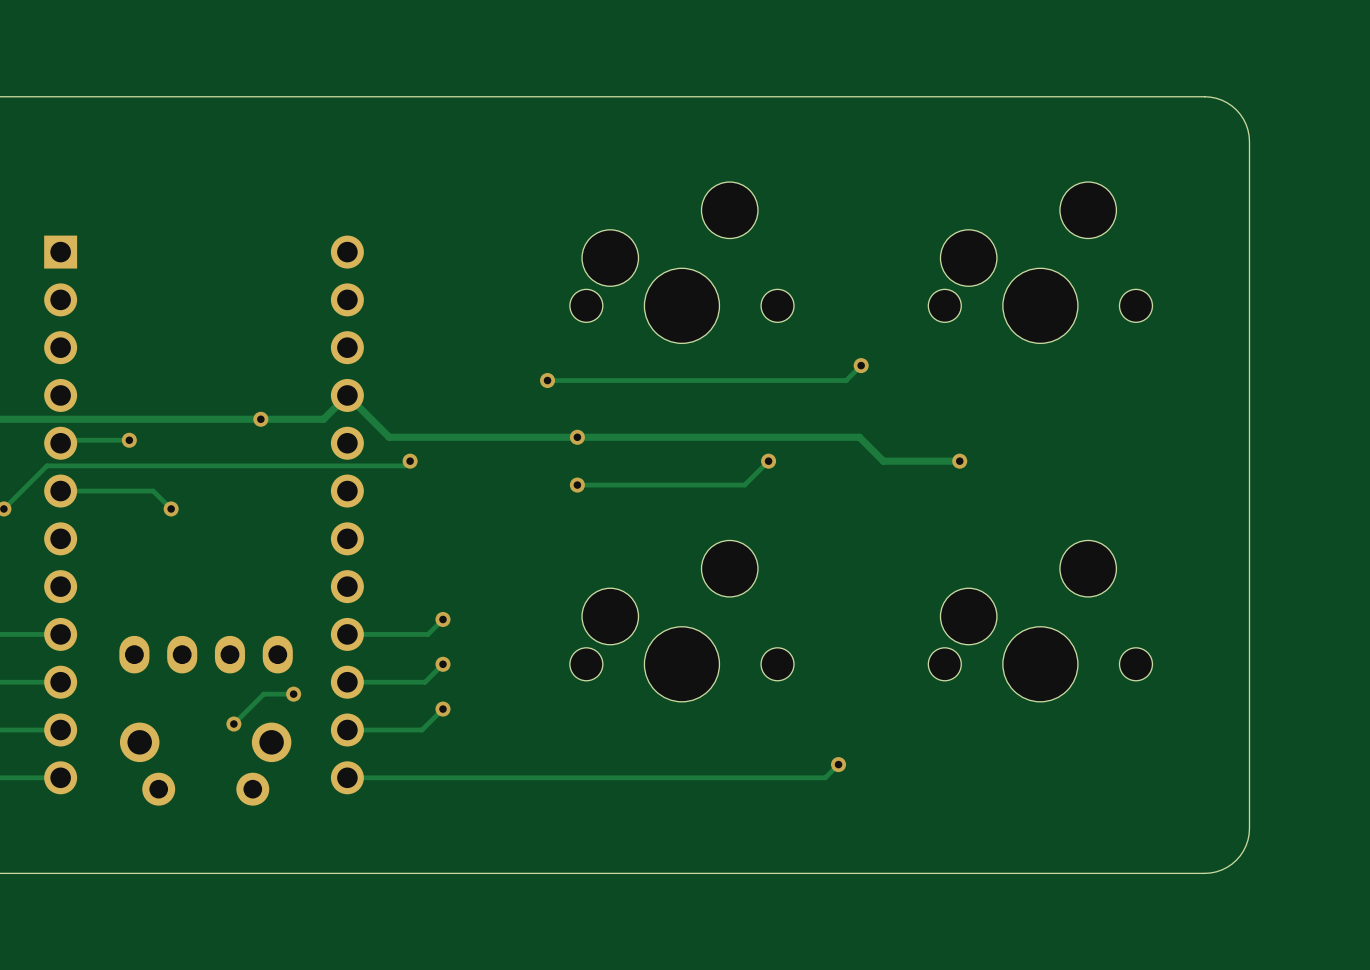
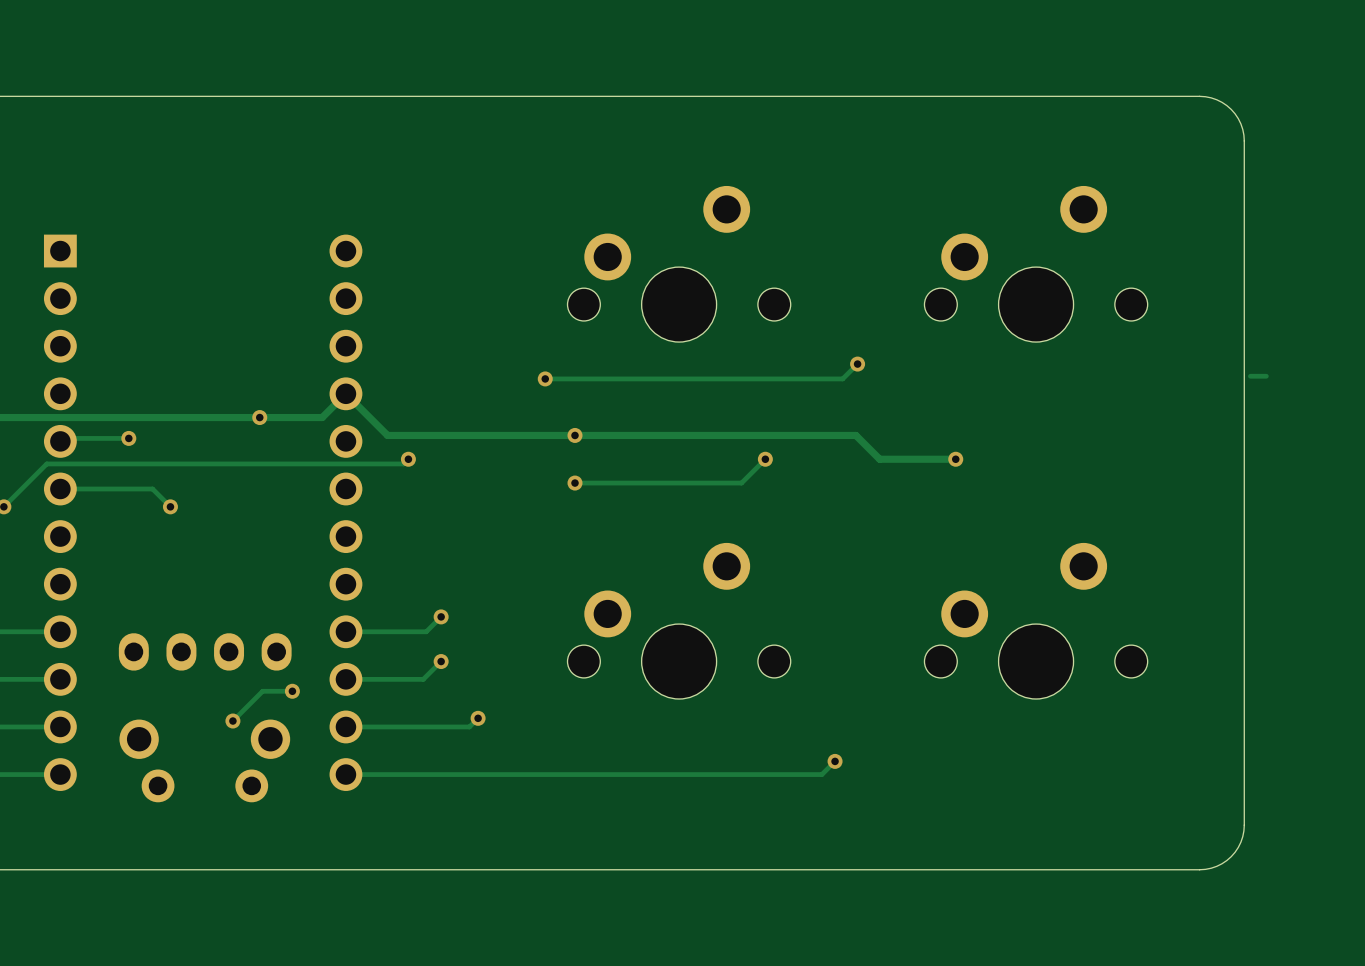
part footprint: [569, 182, 794, 344] -> [567, 185, 791, 343]
part footprint: [928, 182, 1153, 344] -> [924, 185, 1148, 343]
track: none -> (1250, 376) (1266, 376)
part footprint: [569, 540, 794, 702] -> [567, 542, 791, 700]
part footprint: [928, 540, 1153, 702] -> [924, 542, 1148, 700]
track: (442, 709) (422, 730) -> (478, 718) (469, 726) (420, 726)
via position: (442, 709) -> (478, 718)

